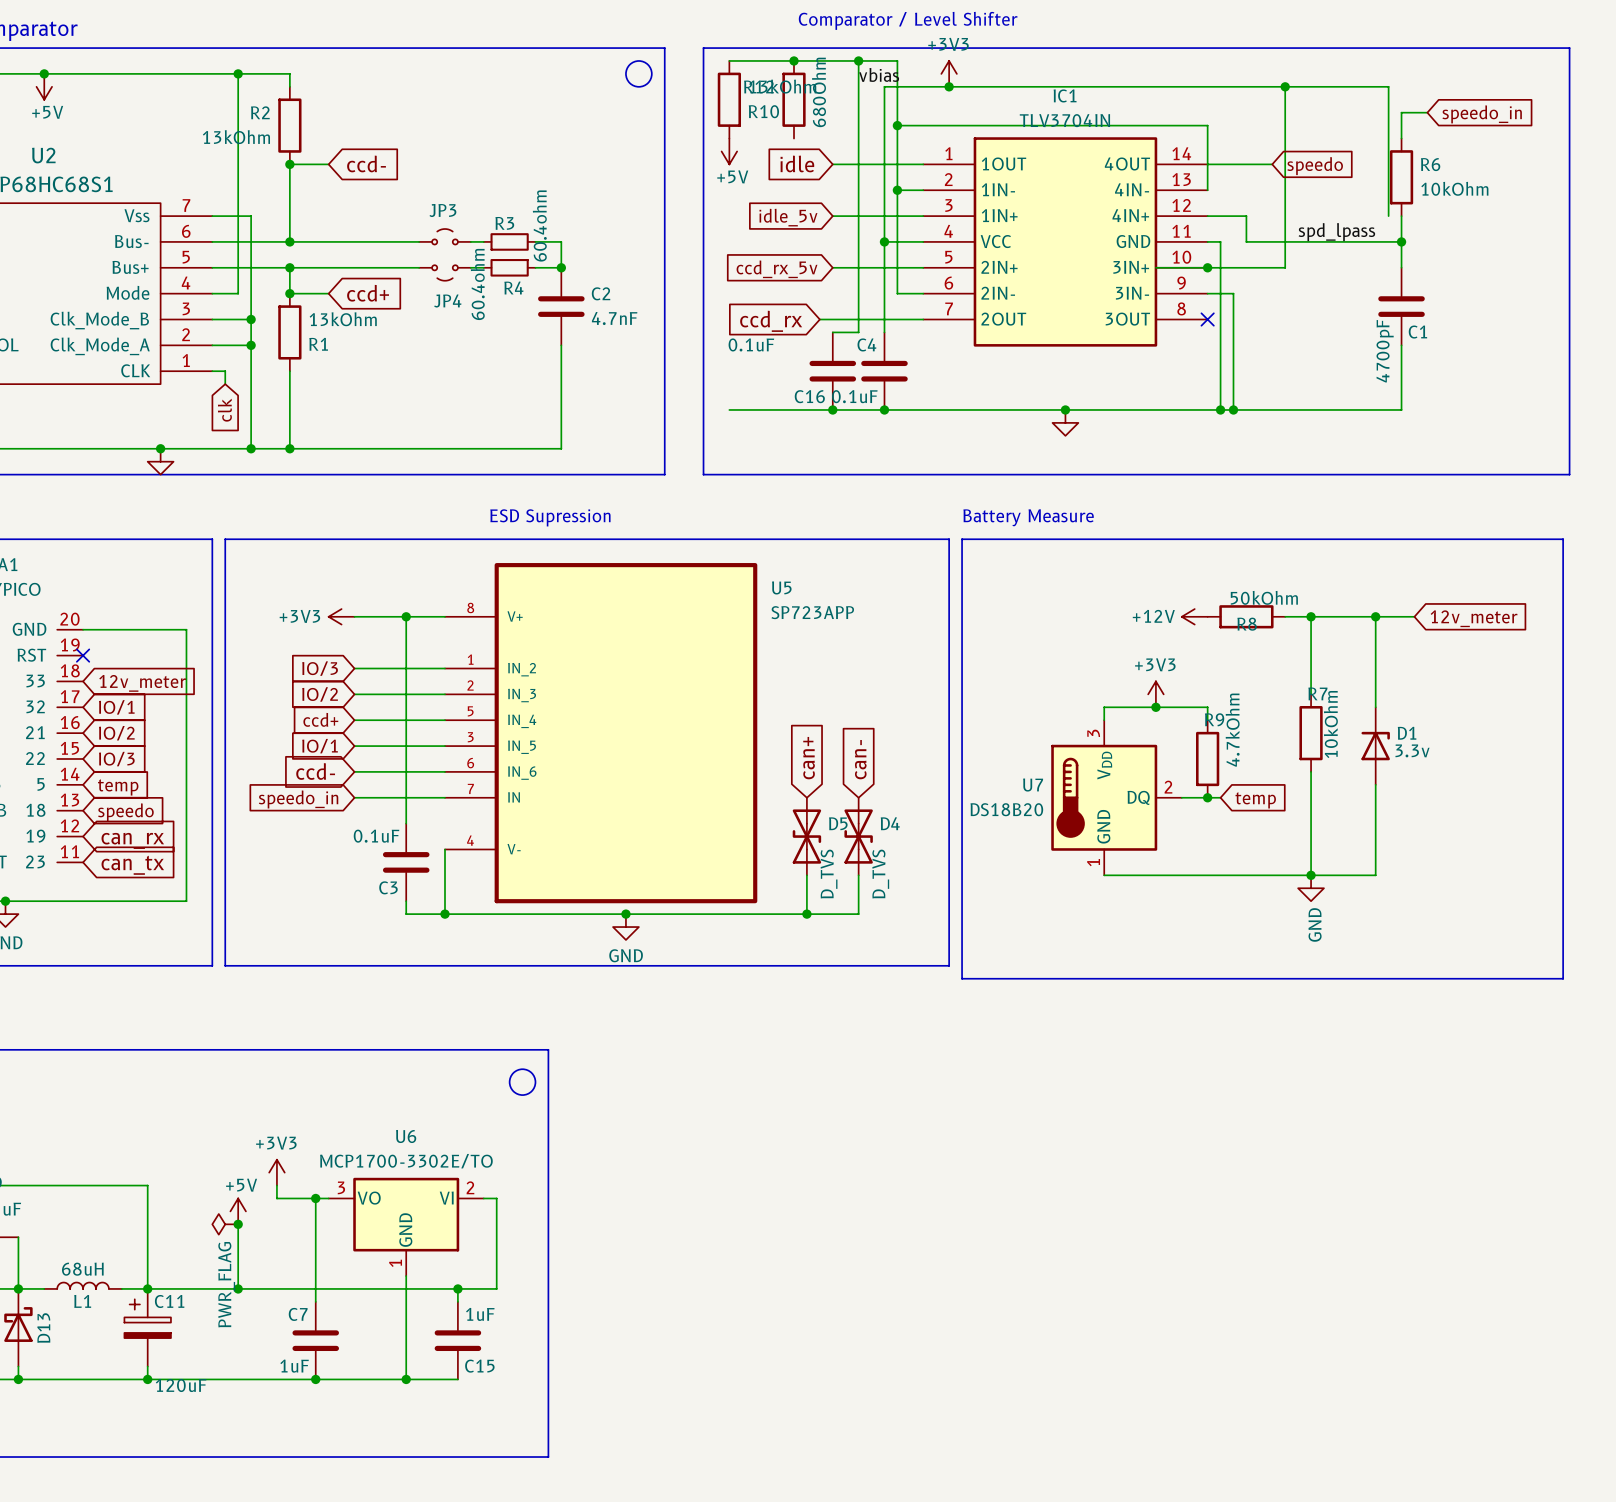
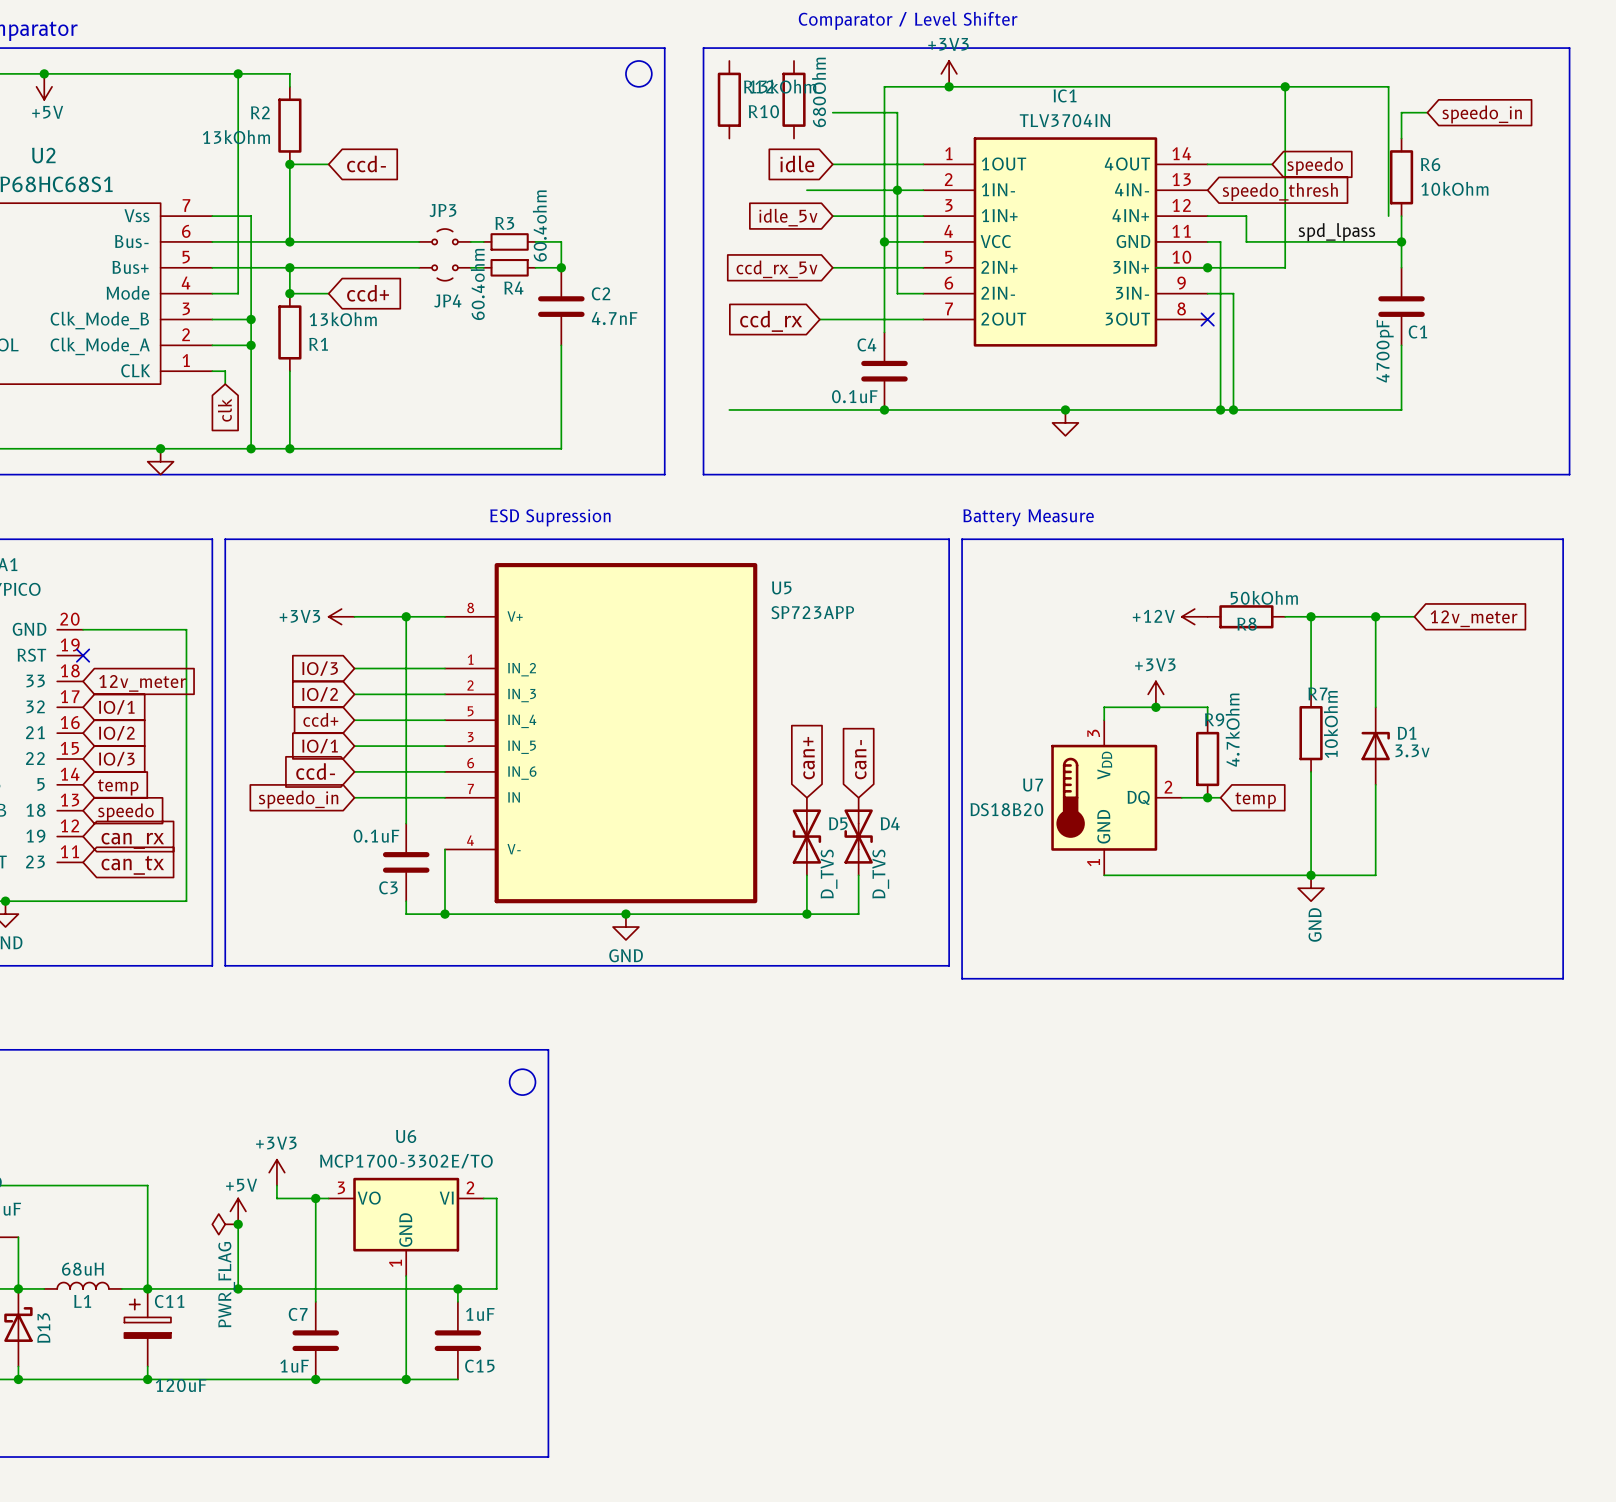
wire: (729, 60) (897, 60) (897, 112) -> (832, 112) (897, 112)
junction: (794, 60) -> none
wire: (858, 60) (858, 332) (832, 332) -> none
junction: (858, 60) -> none
label: vbias (879, 74) -> none
wire: (897, 125) (1207, 125) (1207, 190) -> none
junction: (897, 125) -> none
power symbol: +5V (729, 151) -> none
wire: none -> (806, 190) (897, 190)
global label: none -> speedo_thresh (1280, 191)
C16: 0.1uF (832, 371) -> none
junction: (832, 409) -> none

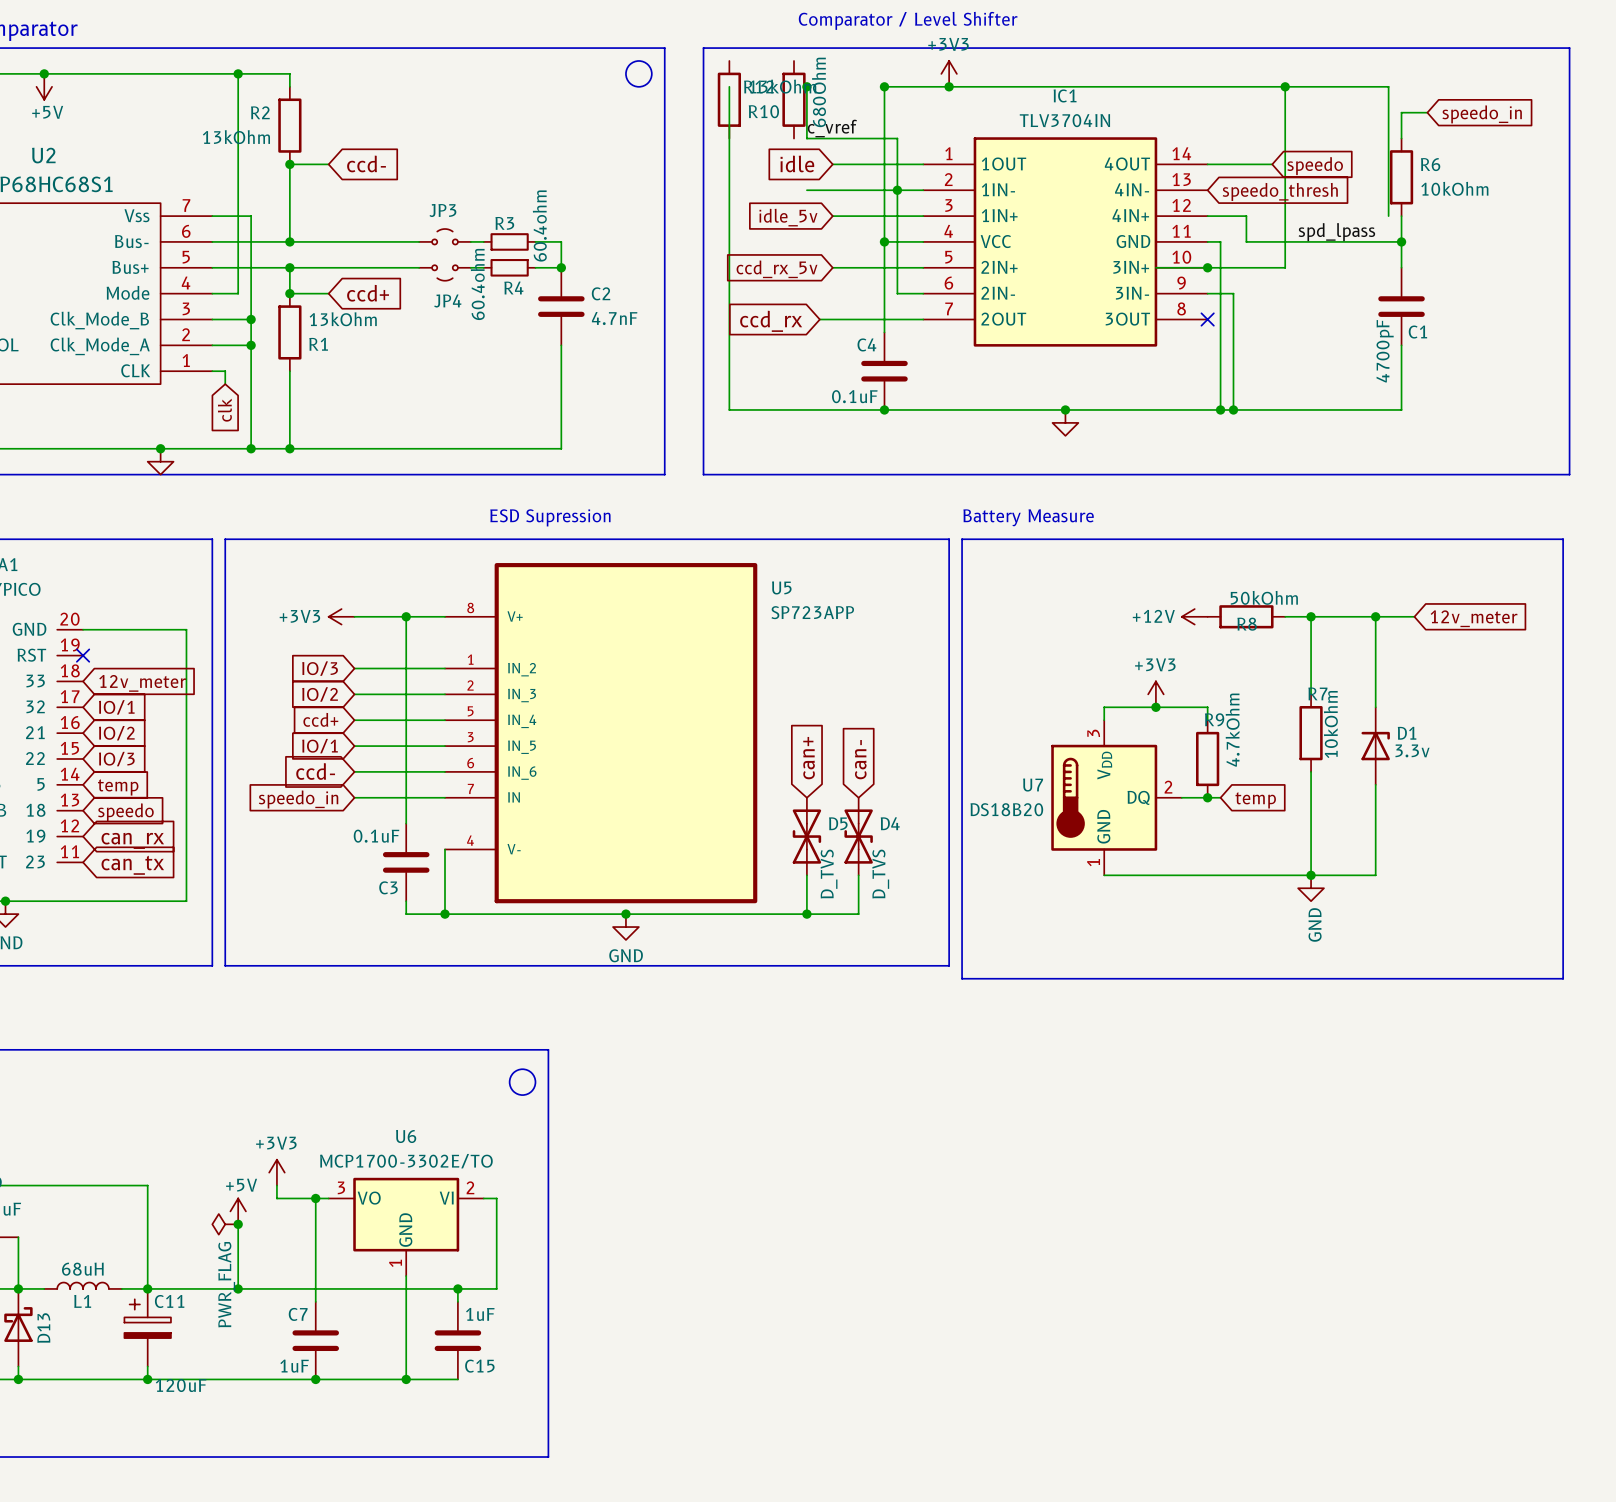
wire: none -> (729, 86) (729, 409)
junction: none -> (806, 86)
junction: none -> (884, 86)
wire: (832, 112) (897, 112) (897, 138) -> (806, 86) (806, 138) (897, 138)
label: none -> c_vref (832, 128)

